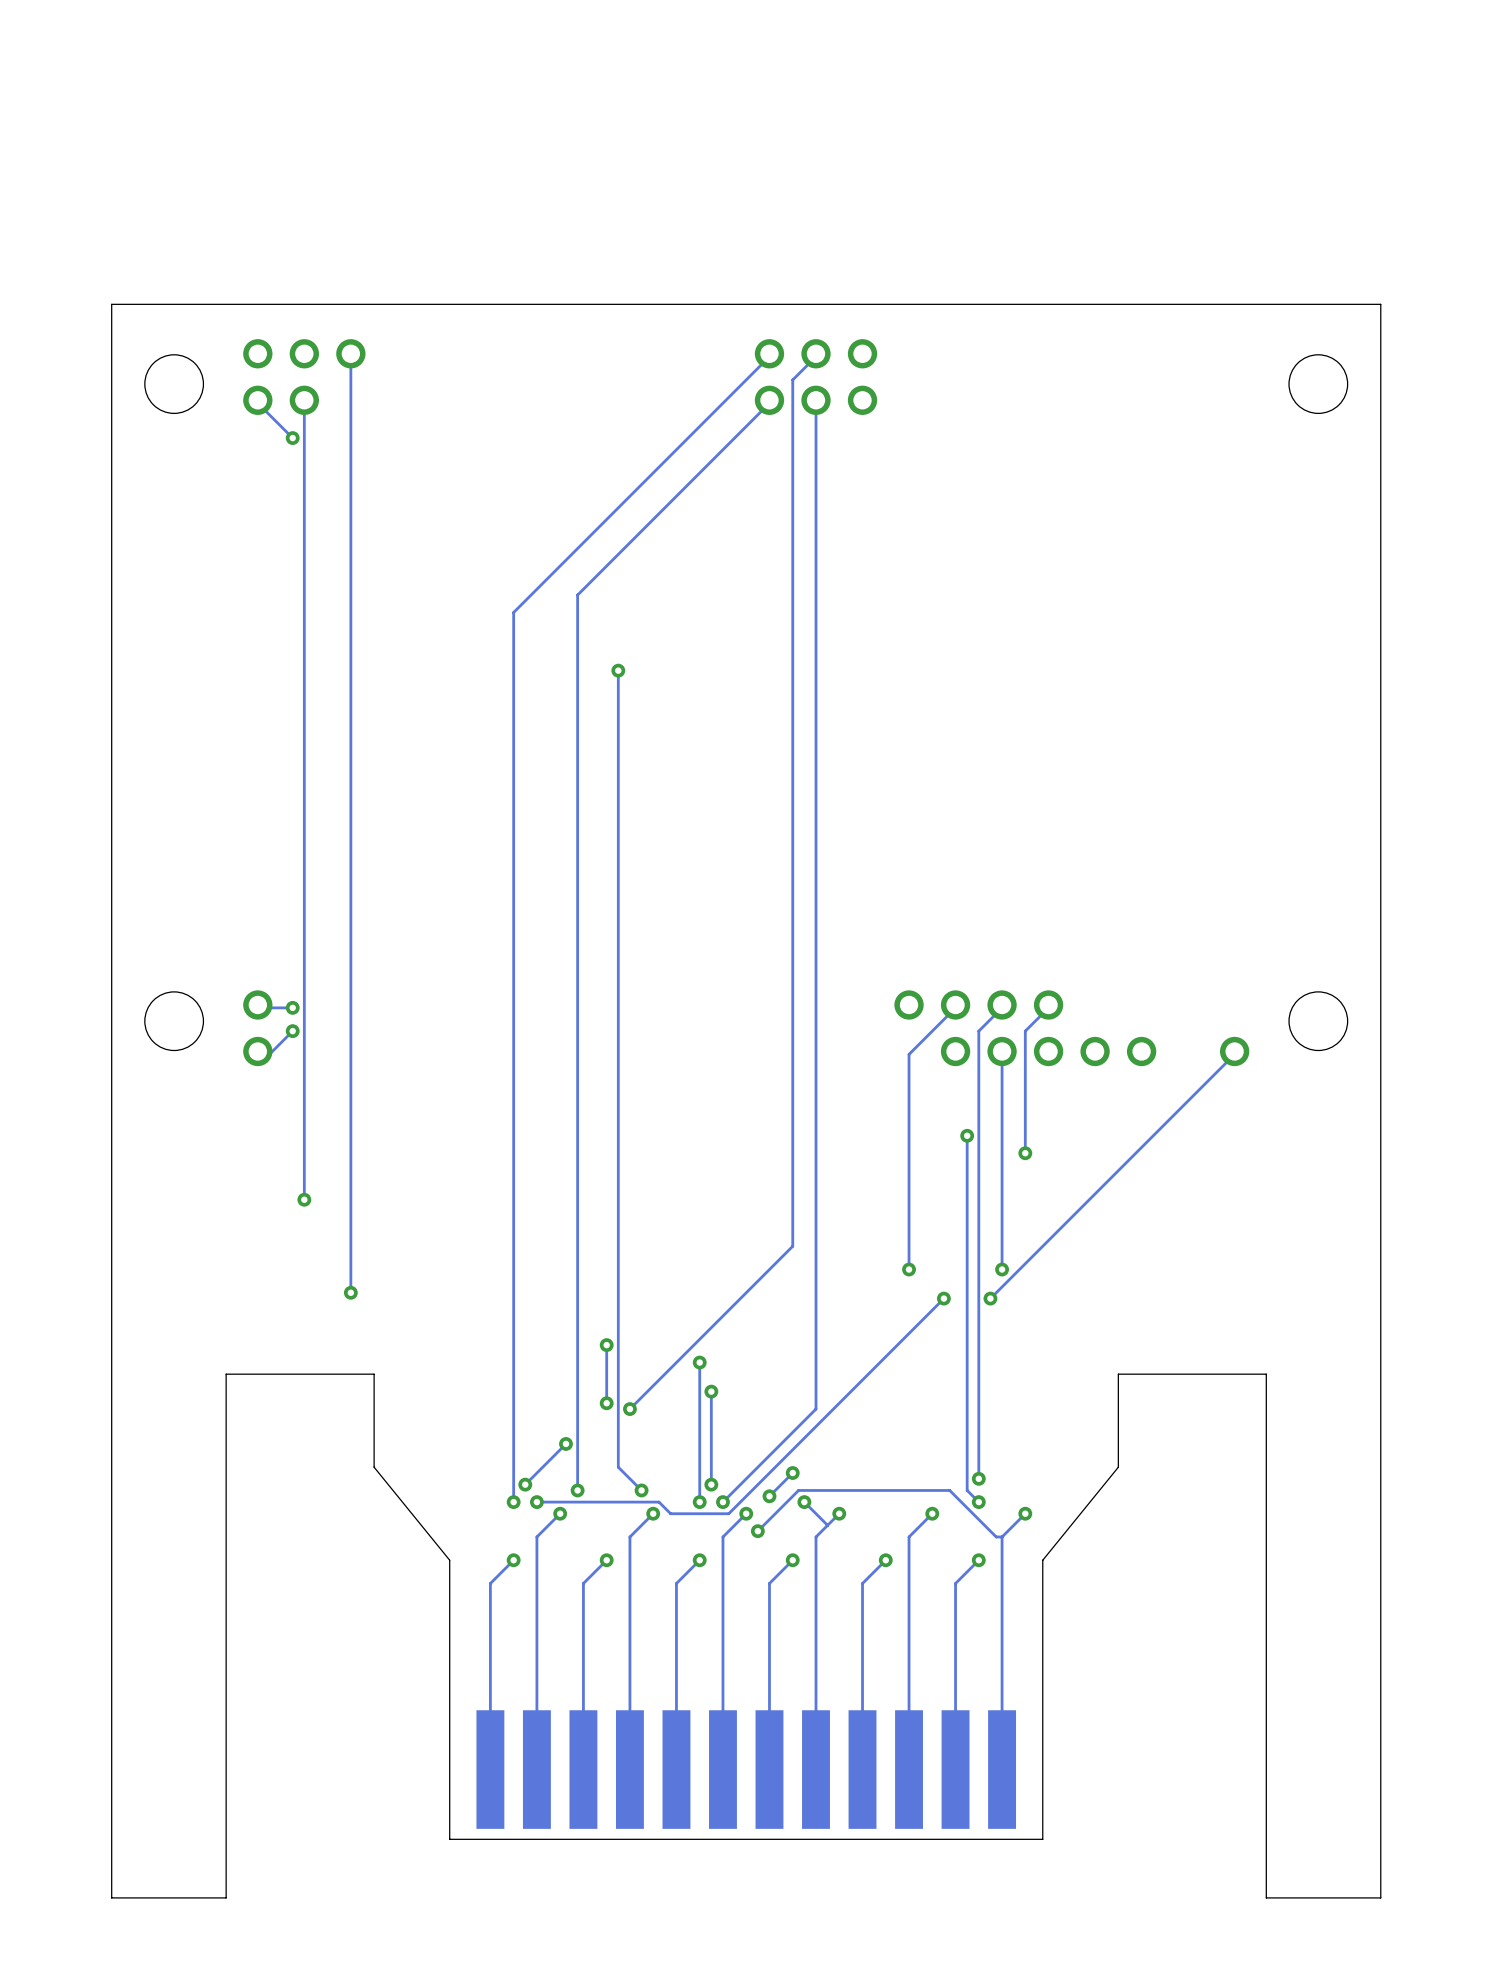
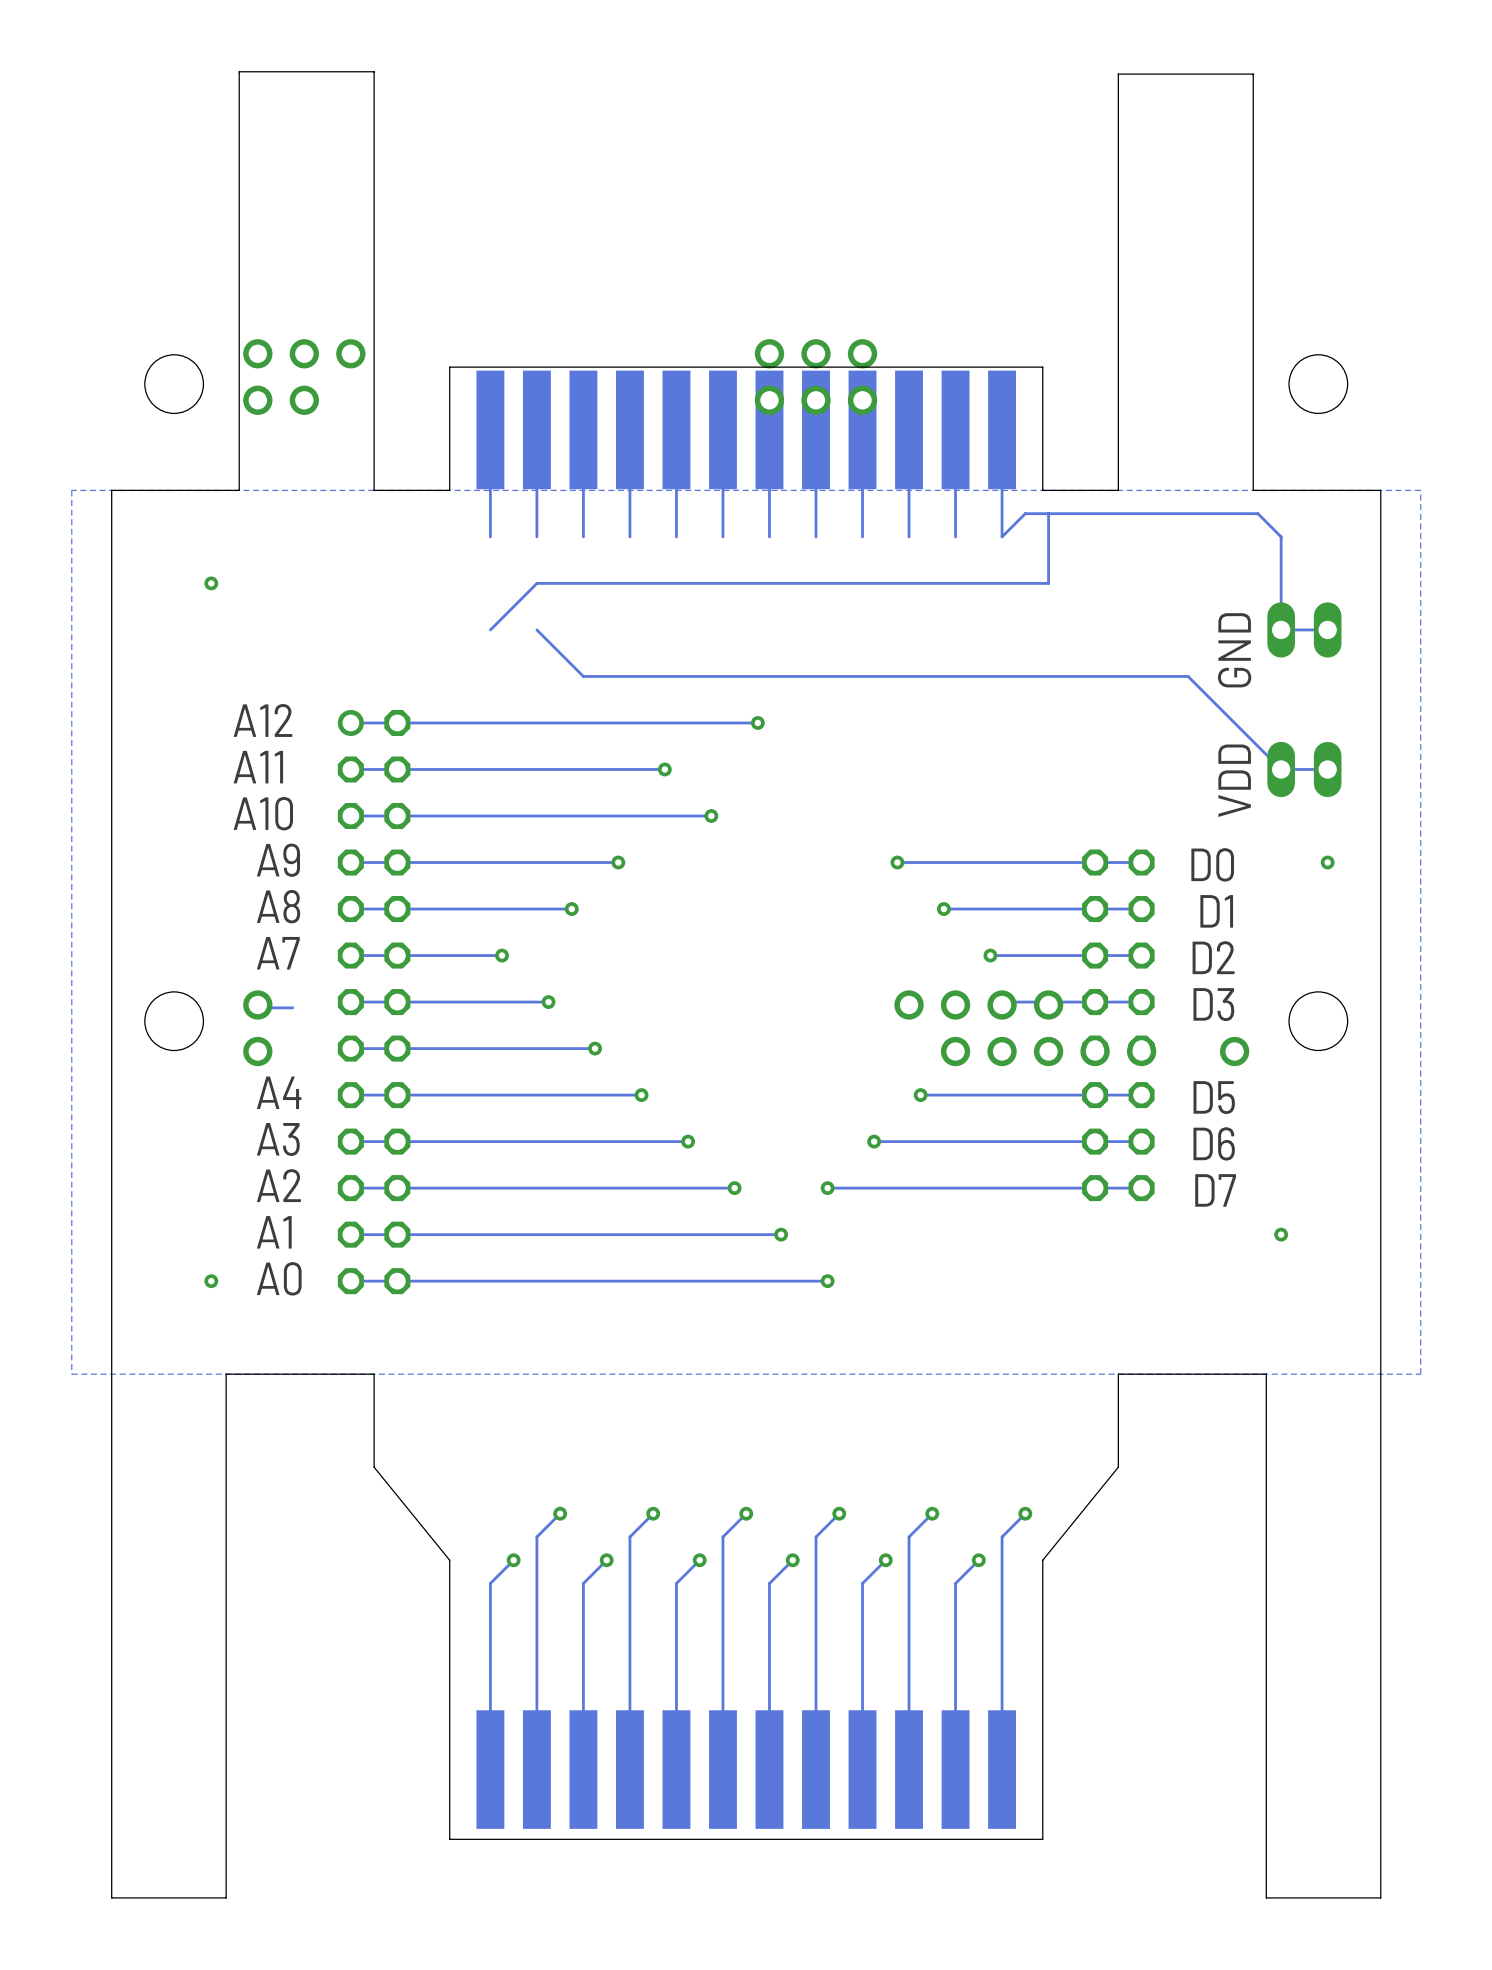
track: (350, 356) (350, 1292) -> none
track: (769, 356) (513, 612) (513, 1502) -> none
track: (816, 356) (792, 379) (792, 1246) (629, 1409) -> none
track: (257, 403) (292, 438) -> none
track: (304, 403) (304, 1199) -> none
track: (769, 403) (577, 595) (577, 1490) -> none
track: (816, 403) (816, 429) -> none
track: none -> (490, 429) (490, 536)
track: none -> (536, 429) (536, 536)
track: none -> (583, 429) (583, 536)
track: none -> (629, 429) (629, 536)
track: none -> (676, 429) (676, 536)
track: none -> (722, 429) (722, 536)
track: none -> (769, 429) (769, 536)
track: none -> (862, 429) (862, 536)
track: none -> (909, 429) (909, 536)
track: none -> (955, 429) (955, 536)
track: none -> (1002, 429) (1002, 536) (1025, 513) (1257, 513) (1281, 536) (1281, 629) (1327, 629)
via: (292, 438) -> none
zone outline: none -> (1420, 490) (1420, 1374) (71, 1374) (71, 490) (1420, 490)
track: none -> (1048, 513) (1048, 583) (536, 583) (490, 629)
track: (816, 536) (816, 1409) (722, 1502) -> none
via: none -> (211, 583)
track: none -> (536, 629) (583, 676) (1188, 676) (1281, 769) (1327, 769)
part: none -> (1304, 629)
text: none -> GND (1234, 650)
track: (618, 670) (618, 1467) (641, 1490) -> none
via: (618, 670) -> none
text: none -> A12 (262, 720)
track: none -> (757, 722) (350, 722)
via: none -> (757, 722)
text: none -> A11 (258, 767)
track: none -> (664, 769) (350, 769)
via: none -> (664, 769)
part: none -> (1304, 769)
text: none -> VDD (1234, 780)
text: none -> A10 (263, 813)
track: none -> (711, 816) (350, 816)
via: none -> (711, 816)
text: none -> A9 (278, 860)
track: none -> (618, 862) (350, 862)
via: none -> (618, 862)
via: none -> (897, 862)
track: none -> (1141, 862) (897, 862)
via: none -> (1327, 862)
text: none -> D0 (1212, 864)
text: none -> A8 (278, 906)
track: none -> (571, 909) (350, 909)
via: none -> (571, 909)
via: none -> (943, 909)
track: none -> (1141, 909) (943, 909)
text: none -> D1 (1216, 911)
text: none -> A7 (278, 953)
track: none -> (502, 955) (350, 955)
via: none -> (502, 955)
via: none -> (990, 955)
track: none -> (1141, 955) (990, 955)
text: none -> D2 (1213, 957)
part: none -> (746, 984)
part: none -> (374, 1002)
track: none -> (548, 1002) (350, 1002)
via: none -> (548, 1002)
track: none -> (1141, 1002) (1013, 1002)
text: none -> D3 (1213, 1004)
via: (292, 1007) -> none
track: (955, 1007) (909, 1054) (909, 1269) -> none
track: (1002, 1007) (978, 1031) (978, 1478) -> none
track: (1048, 1007) (1025, 1031) (1025, 1153) -> none
part: none -> (1118, 1025)
track: (292, 1031) (269, 1054) (257, 1054) -> none
via: (292, 1031) -> none
track: none -> (595, 1048) (350, 1048)
via: none -> (595, 1048)
track: (1002, 1054) (1002, 1269) -> none
track: (1234, 1054) (990, 1298) -> none
text: none -> A4 (279, 1092)
track: none -> (641, 1095) (350, 1095)
via: none -> (641, 1095)
via: none -> (920, 1095)
track: none -> (1141, 1095) (920, 1095)
text: none -> D5 (1214, 1097)
part: (746, 1101) -> none
track: (967, 1135) (967, 1490) (978, 1502) -> none
via: (967, 1135) -> none
text: none -> A3 (278, 1139)
track: none -> (688, 1141) (350, 1141)
via: none -> (688, 1141)
via: none -> (874, 1141)
track: none -> (1141, 1141) (874, 1141)
text: none -> D6 (1214, 1143)
via: (1025, 1153) -> none
text: none -> A2 (278, 1185)
track: none -> (734, 1188) (350, 1188)
via: none -> (734, 1188)
via: none -> (827, 1188)
track: none -> (1141, 1188) (827, 1188)
text: none -> D7 (1215, 1190)
via: (304, 1199) -> none
text: none -> A1 (274, 1232)
track: none -> (781, 1234) (350, 1234)
via: none -> (781, 1234)
via: none -> (1281, 1234)
via: (909, 1269) -> none
via: (1002, 1269) -> none
text: none -> A0 (279, 1278)
via: none -> (211, 1281)
track: none -> (827, 1281) (350, 1281)
via: none -> (827, 1281)
via: (350, 1292) -> none
track: (943, 1298) (728, 1513) (670, 1513) (659, 1502) (536, 1502) -> none
via: (943, 1298) -> none
via: (990, 1298) -> none
track: (606, 1345) (606, 1403) -> none
via: (606, 1345) -> none
track: (699, 1362) (699, 1502) -> none
via: (699, 1362) -> none
track: (711, 1391) (711, 1484) -> none
via: (711, 1391) -> none
via: (606, 1403) -> none
via: (629, 1409) -> none
track: (565, 1443) (525, 1484) -> none
via: (565, 1443) -> none
track: (792, 1473) (769, 1496) -> none
via: (792, 1473) -> none
via: (978, 1478) -> none
via: (525, 1484) -> none
via: (711, 1484) -> none
via: (577, 1490) -> none
via: (641, 1490) -> none
via: (769, 1496) -> none
via: (513, 1502) -> none
via: (536, 1502) -> none
via: (699, 1502) -> none
via: (722, 1502) -> none
track: (804, 1502) (827, 1525) -> none
via: (804, 1502) -> none
via: (978, 1502) -> none
track: (757, 1531) (798, 1490) (949, 1490) (996, 1536) (1002, 1536) -> none
via: (757, 1531) -> none

